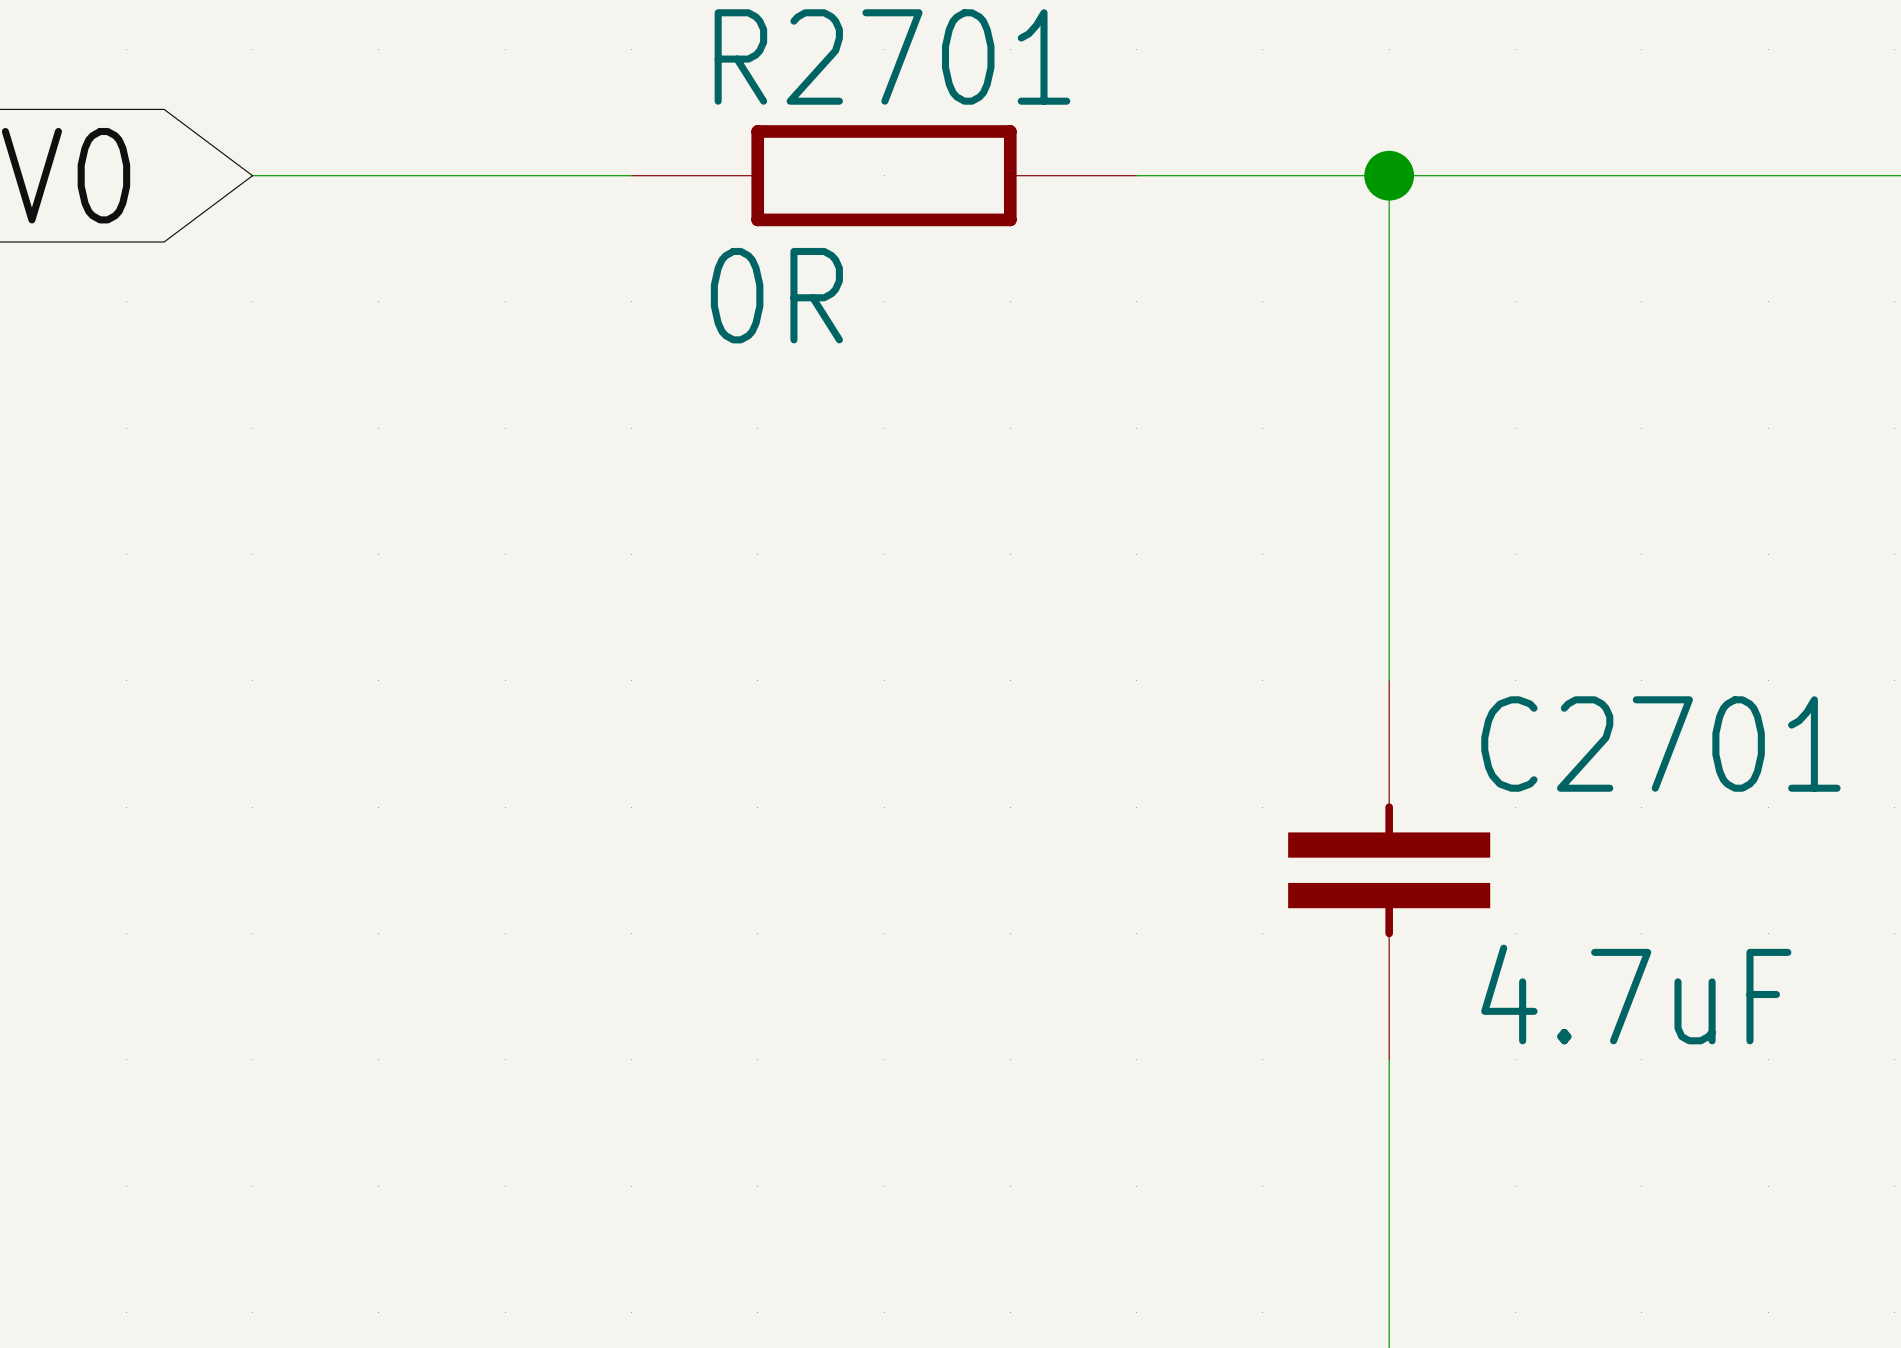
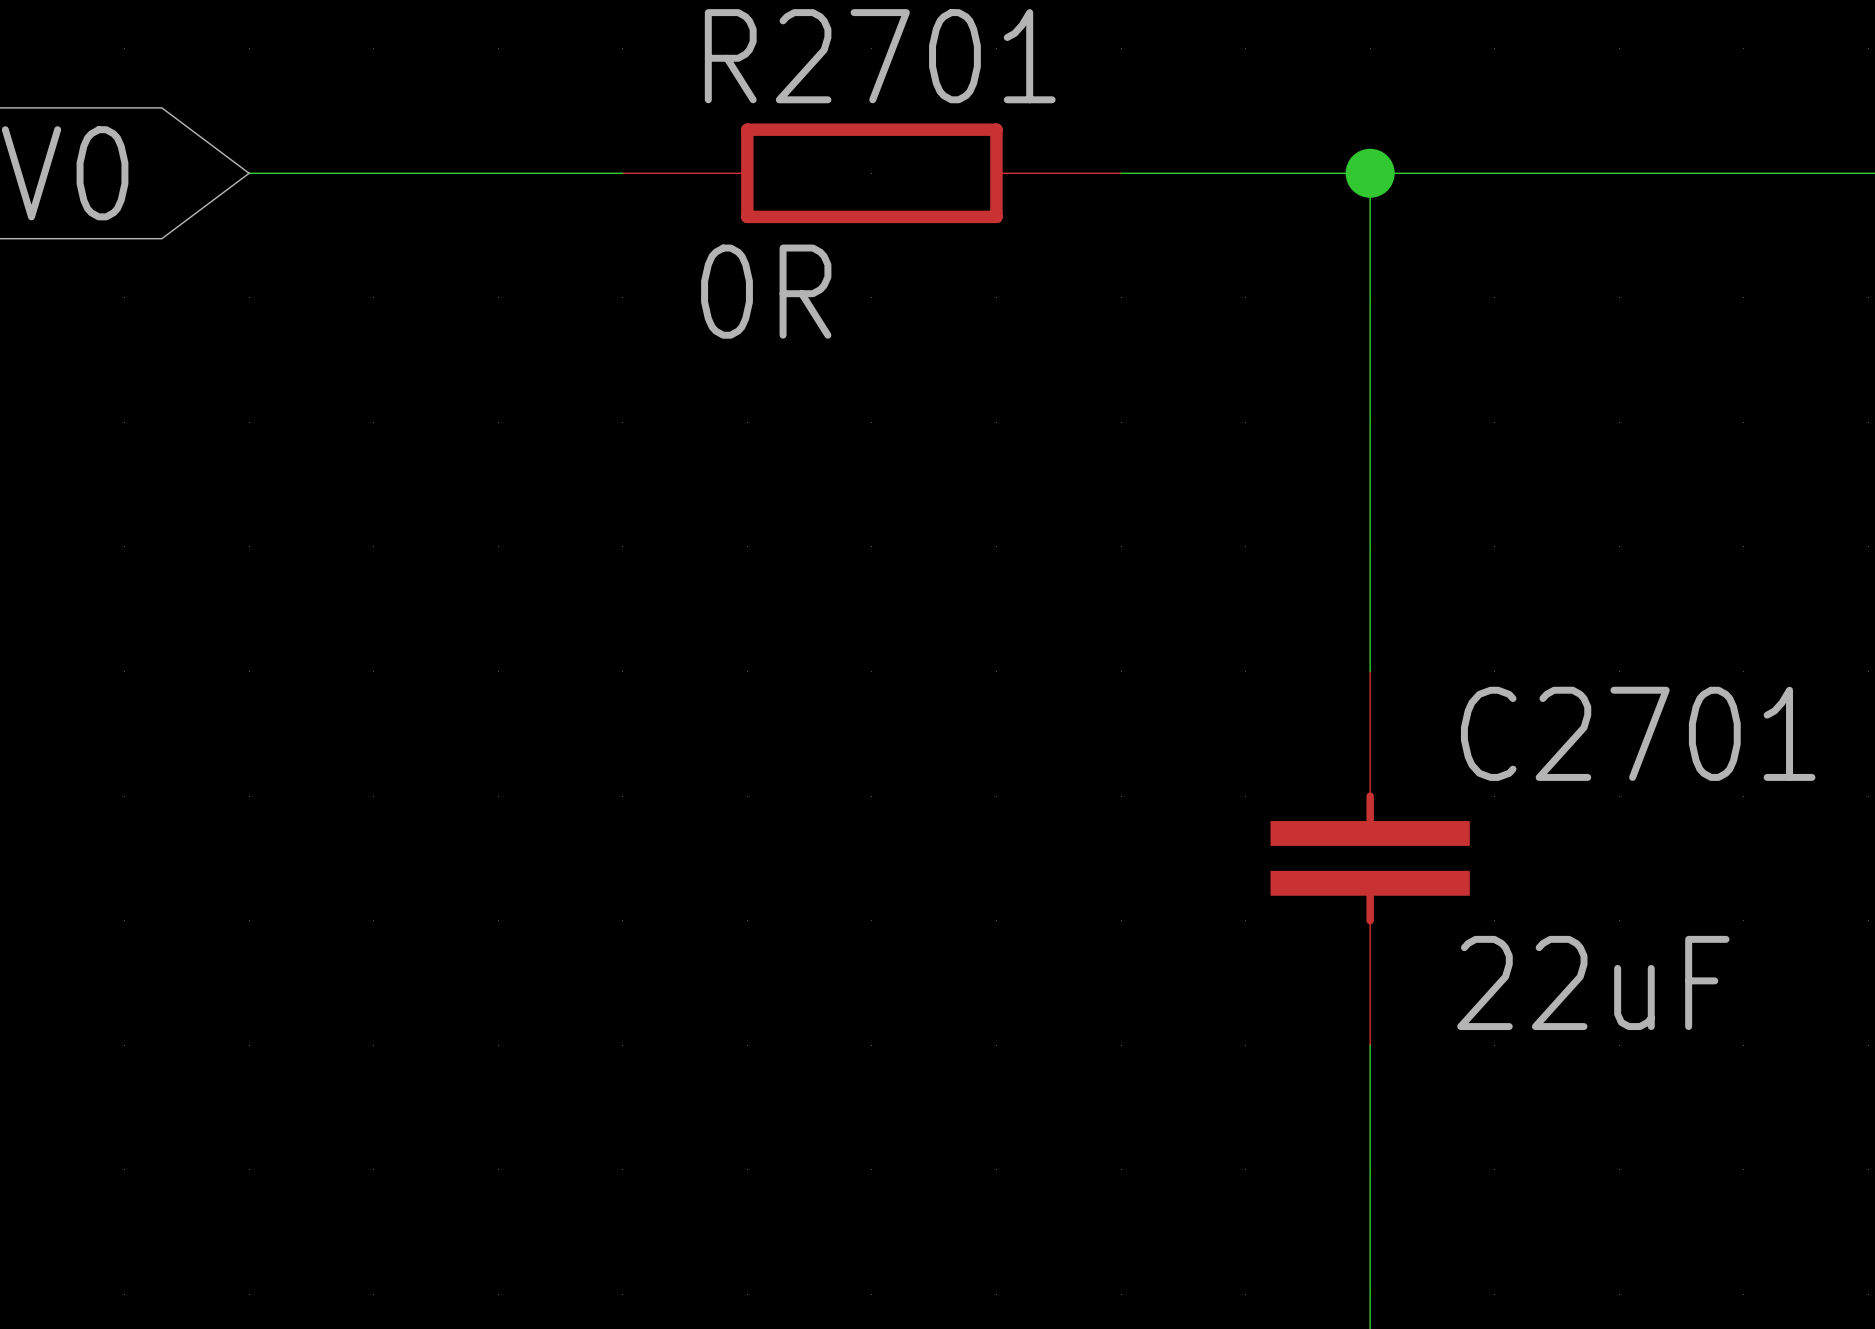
C2701 value: 4.7uF (1636, 994) -> 22uF (1593, 982)

